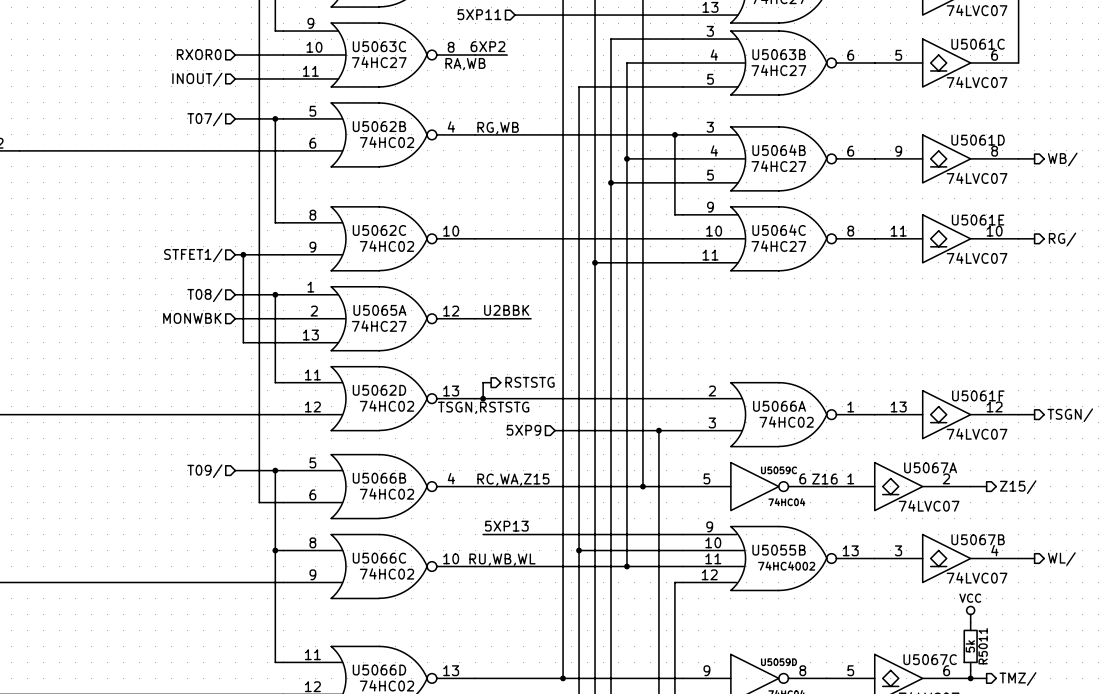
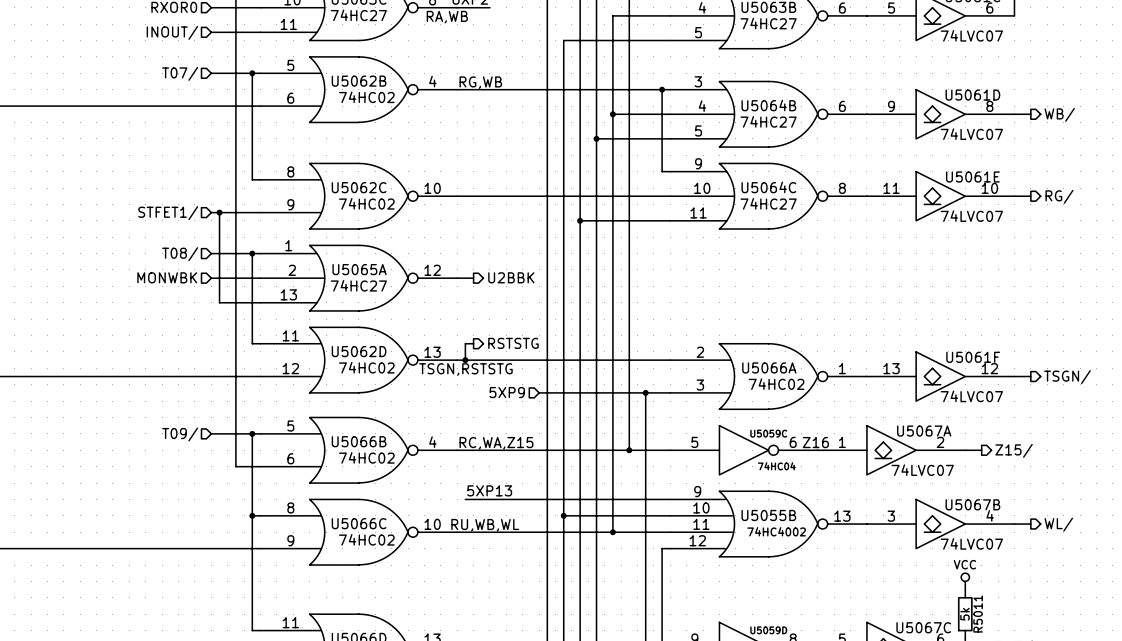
label: U2BBK (506, 310) -> none
wire: (491, 318) (531, 318) -> none
hierarchical label: none -> U2BBK (511, 277)

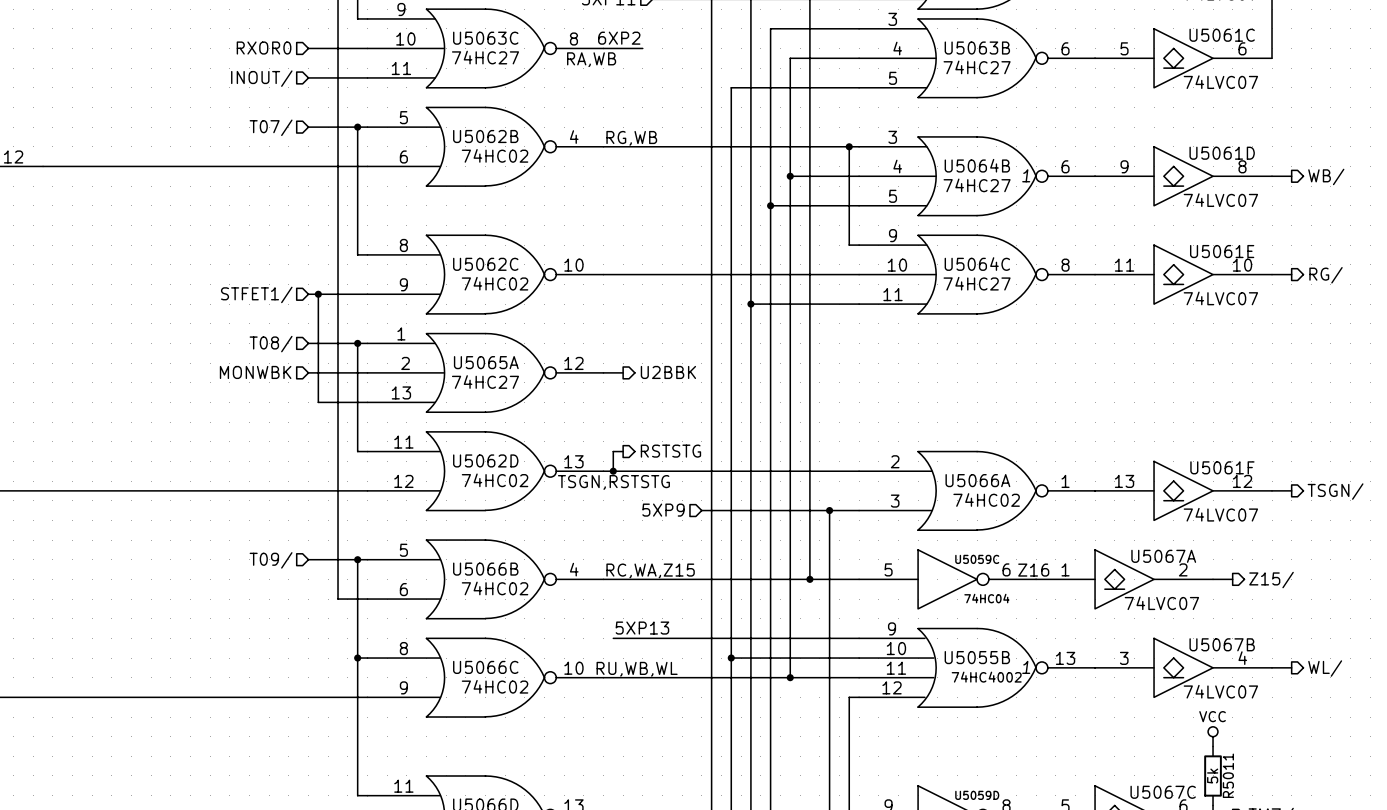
U5064B text: none -> 1 (1026, 175)
U5055B text: none -> 1 (1026, 667)

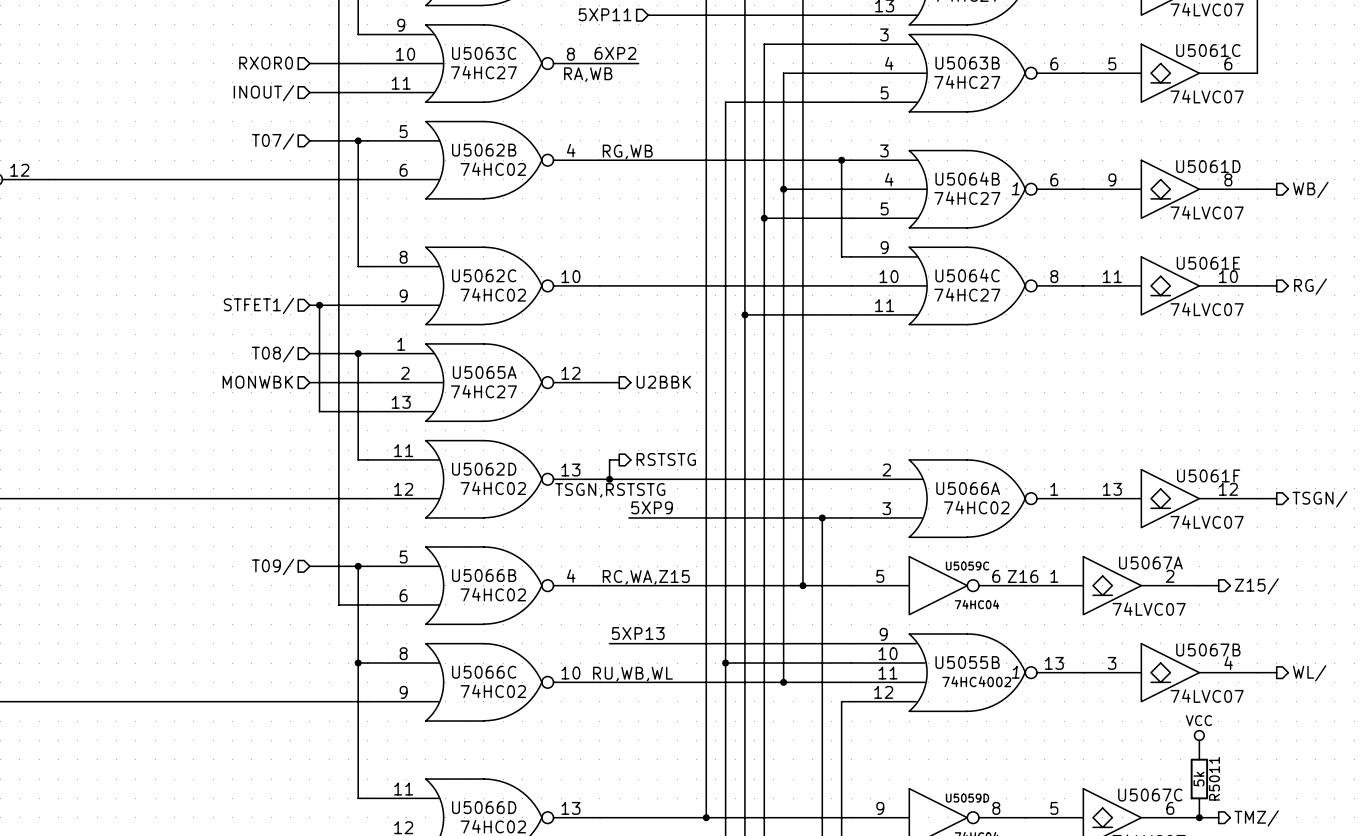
label: none -> 5XP9 (652, 507)
wire: none -> (628, 517) (696, 517)
hierarchical label: 5XP9 (663, 510) -> none

